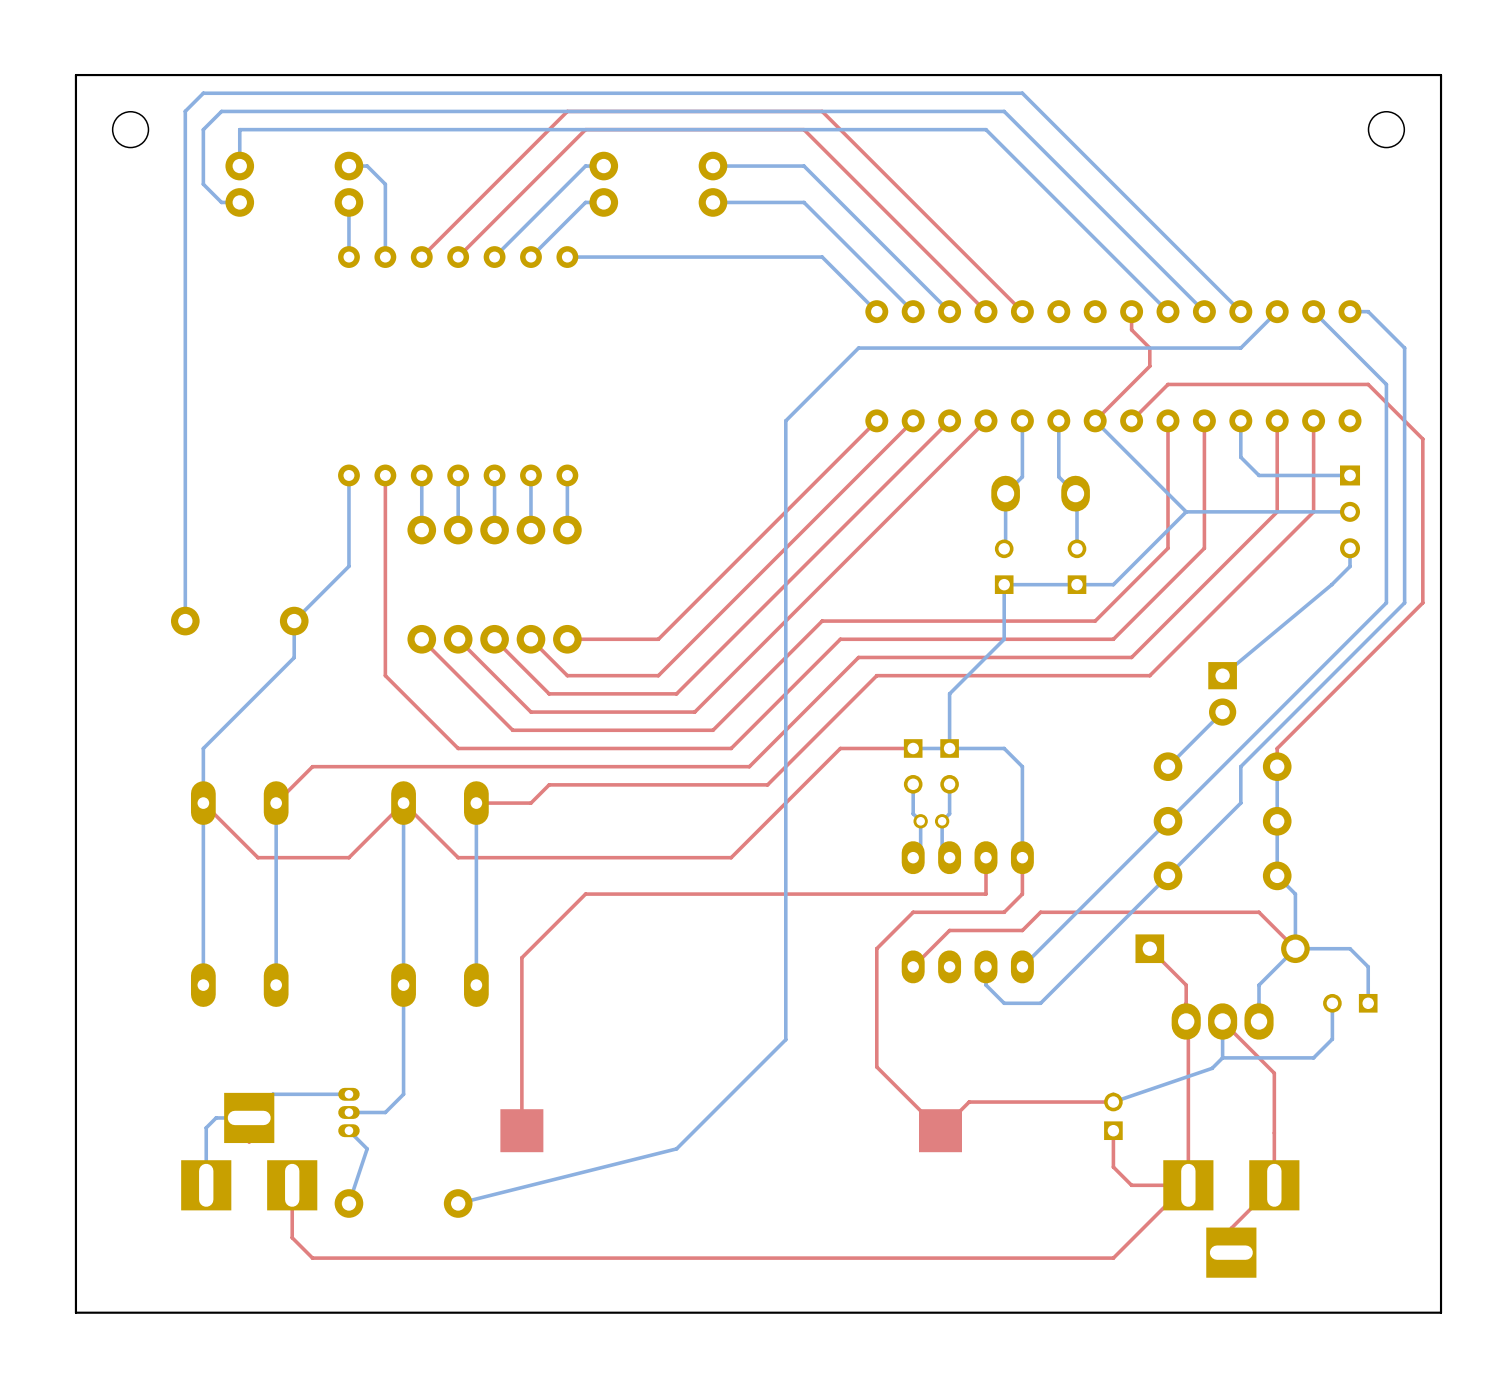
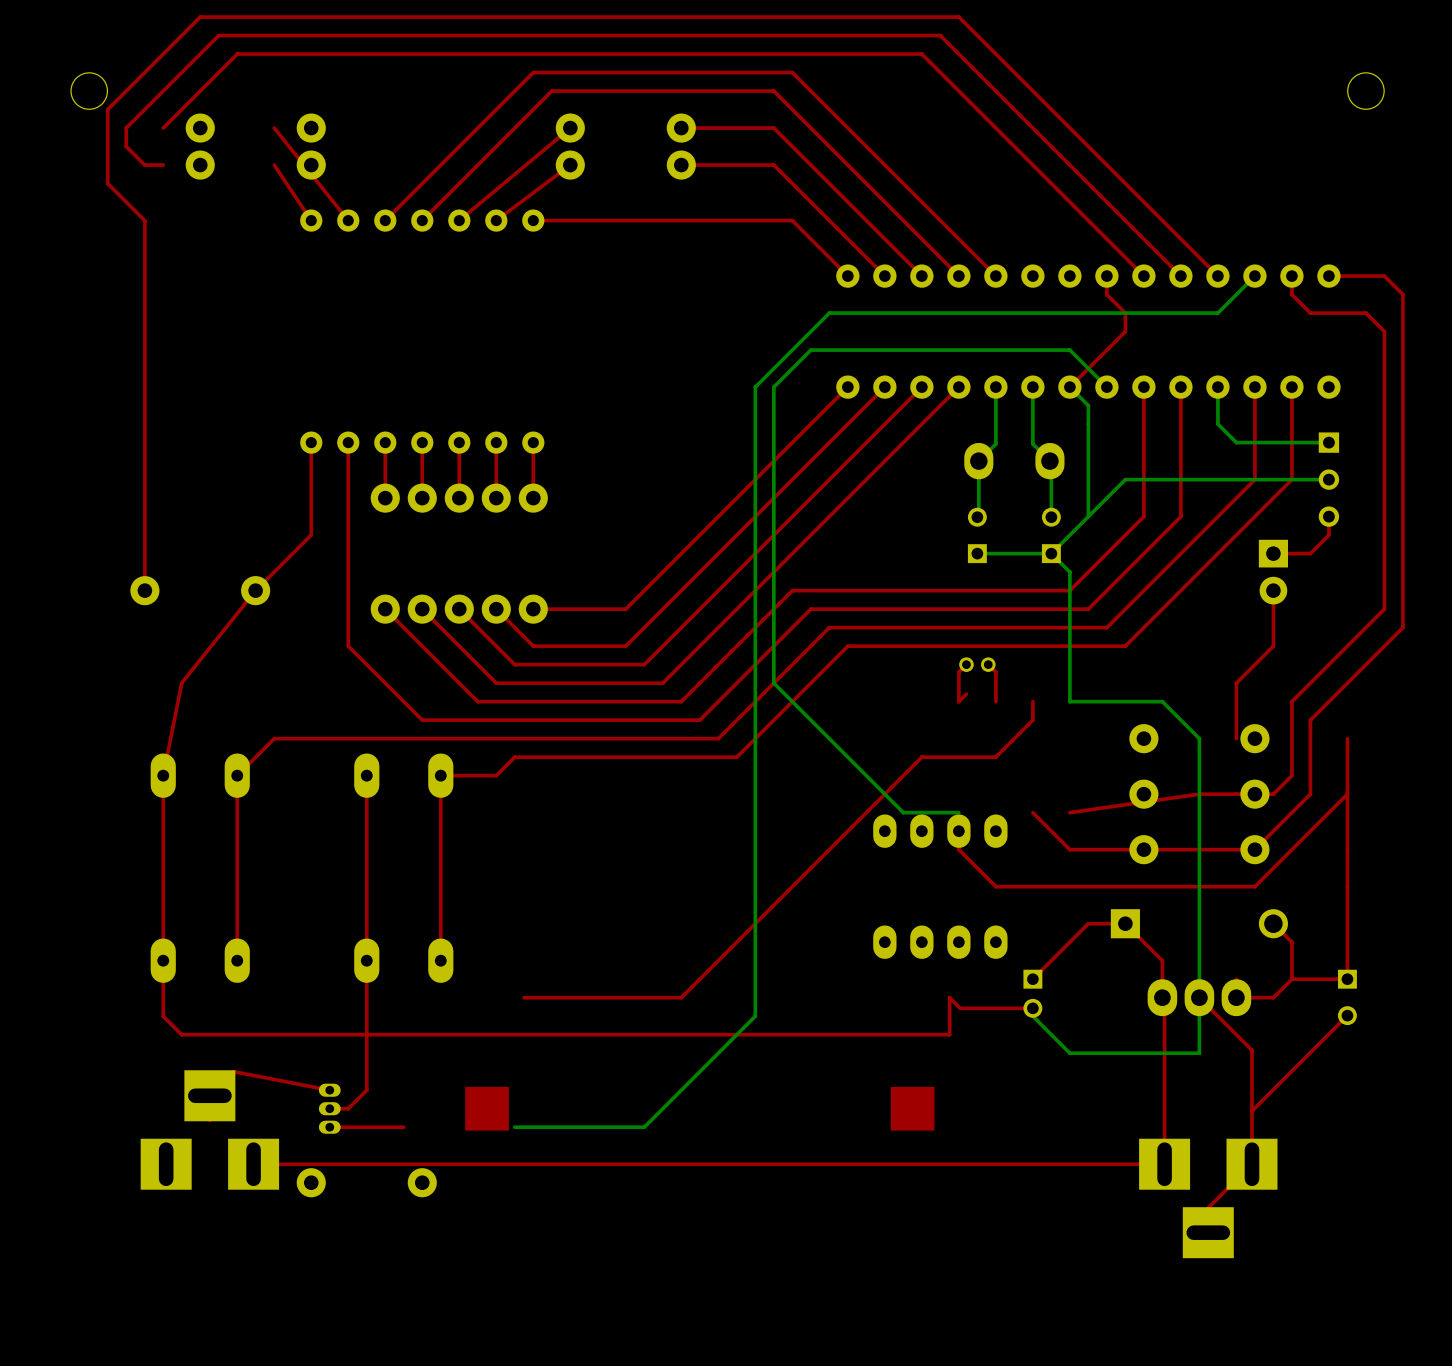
board edge: (1441, 75) (1441, 1312) (75, 1312) (75, 75) (1441, 75) -> none
top track: none -> (163, 128) (237, 54) (921, 54) (1143, 276)
bottom track: (239, 166) (239, 129) (986, 129) (1168, 311) -> none
top track: none -> (274, 128) (348, 220)
bottom track: (348, 166) (367, 166) (385, 184) (385, 257) -> none
top track: none -> (570, 128) (459, 220)
bottom track: (603, 166) (585, 166) (494, 257) -> none
top track: none -> (681, 128) (773, 128) (921, 276)
bottom track: (712, 166) (803, 166) (949, 311) -> none
top track: none -> (163, 165) (144, 165) (126, 146) (126, 128) (218, 35) (940, 35) (1180, 276)
bottom track: (239, 202) (221, 202) (203, 184) (203, 129) (221, 111) (1004, 111) (1204, 311) -> none
top track: none -> (274, 165) (311, 220)
bottom track: (348, 202) (348, 257) -> none
top track: none -> (570, 165) (496, 220)
bottom track: (603, 202) (585, 202) (530, 257) -> none
top track: none -> (681, 165) (773, 165) (884, 276)
bottom track: (712, 202) (803, 202) (913, 311) -> none
top track: none -> (533, 220) (792, 220) (847, 276)
bottom track: (567, 257) (822, 257) (876, 311) -> none
top track: none -> (1217, 276) (958, 17) (200, 17) (107, 109) (107, 183) (144, 220) (144, 590)
bottom track: (1240, 311) (1022, 93) (203, 93) (185, 111) (185, 621) -> none
top track: none -> (1291, 276) (1291, 294) (1310, 313) (1365, 313) (1384, 331) (1384, 609) (1291, 701) (1291, 775) (1273, 794) (1199, 794) (1069, 812)
bottom track: (1313, 311) (1386, 384) (1386, 602) (1022, 966) -> none
bottom track: (1350, 311) (1368, 311) (1404, 348) (1404, 602) (1240, 766) (1240, 803) (1040, 1003) (1004, 1003) (986, 985) (986, 966) -> none
top track: (1131, 420) (1168, 384) (1368, 384) (1422, 439) -> (1328, 276) (1384, 276) (1402, 294) (1402, 405)
bottom track: none -> (1106, 387) (1069, 350) (810, 350) (773, 387) (773, 683) (903, 812) (958, 812)
bottom track: (1113, 439) (1186, 511) (1113, 584) (1077, 584) -> (1088, 405) (1088, 516)
top track: none -> (311, 442) (311, 534) (255, 590) (181, 683) (163, 775) (163, 1016) (181, 1034) (949, 1034) (949, 997) (960, 1008) (1032, 1008) (1032, 1016)
bottom track: (348, 475) (348, 566) (294, 621) (294, 657) (203, 748) (203, 985) -> none
top track: none -> (385, 442) (385, 498)
bottom track: (421, 475) (421, 530) -> none
top track: none -> (422, 442) (422, 498)
bottom track: (458, 475) (458, 530) -> none
top track: none -> (459, 442) (459, 498)
bottom track: (494, 475) (494, 530) -> none
top track: none -> (496, 442) (496, 498)
bottom track: (530, 475) (530, 530) -> none
top track: none -> (533, 442) (533, 498)
bottom track: (567, 475) (567, 530) -> none
bottom track: none -> (1162, 479) (1125, 479) (1051, 553) (1069, 572) (1069, 701) (1162, 701) (1199, 738) (1199, 997)
top track: none -> (1328, 516) (1328, 535) (1310, 553) (1273, 553)
bottom track: (1350, 548) (1350, 566) (1331, 584) (1222, 675) -> none
bottom track: (1004, 584) (1004, 639) (949, 693) (949, 748) -> none
top track: (1422, 602) (1277, 748) (1277, 766) -> (1402, 572) (1402, 627) (1310, 720) (1310, 794) (1254, 849) (1069, 849) (1032, 812)
top track: none -> (1273, 590) (1273, 646) (1236, 683) (1236, 738)
top track: none -> (966, 664) (958, 672) (958, 701) (966, 694)
top track: none -> (988, 664) (995, 672) (995, 701)
part position: (1222, 693) -> (1273, 572)
bottom track: (1222, 712) (1168, 766) -> none
top track: none -> (1032, 701) (1032, 720) (995, 757) (921, 757) (681, 997) (524, 997)
top track: (913, 748) (840, 748) (731, 857) (458, 857) (403, 803) (348, 857) (257, 857) (203, 803) -> none
bottom track: (913, 748) (1004, 748) (1022, 766) (1022, 857) -> none
part: (913, 766) -> none
part: (949, 766) -> none
bottom track: (1277, 766) (1277, 875) (1295, 894) (1295, 948) -> none
top track: none -> (1347, 738) (1347, 979) (1291, 979)
bottom track: (949, 784) (949, 813) (942, 821) (942, 850) (949, 857) -> none
bottom track: (911, 785) (913, 784) (913, 813) (920, 821) (920, 850) (913, 857) -> none
top track: none -> (237, 775) (237, 960)
bottom track: (276, 803) (276, 985) -> none
top track: none -> (366, 775) (366, 960)
bottom track: (403, 803) (403, 1094) (385, 1112) (348, 1112) -> none
top track: none -> (440, 775) (440, 960)
bottom track: (476, 803) (476, 985) -> none
part position: (931, 821) -> (977, 664)
top track: none -> (1347, 794) (1254, 886) (1236, 886)
top track: (1022, 857) (1022, 894) (1004, 912) (913, 912) (876, 948) (876, 1066) (950, 1141) -> none
top track: (986, 875) (986, 894) (585, 894) (521, 957) (521, 1130) -> none
top track: (1040, 912) (1022, 930) (949, 930) (913, 966) -> (1014, 886) (995, 886) (958, 849)
top track: (1259, 912) (1295, 948) -> (1291, 979) (1291, 942) (1273, 923)
top track: none -> (1125, 923) (1088, 923) (1032, 979)
bottom track: (1295, 948) (1350, 948) (1368, 966) (1368, 1003) -> none
bottom track: (1295, 948) (1259, 985) (1259, 1021) -> none
top track: none -> (366, 979) (366, 1090) (348, 1108) (329, 1108)
top track: none -> (1291, 979) (1273, 997) (1236, 997)
bottom track: (1332, 1003) (1332, 1039) (1313, 1057) (1222, 1057) (1212, 1068) (1113, 1102) (1113, 1094) -> none
part rotation: 0° (1350, 1003) -> 90° counterclockwise (1347, 997)
bottom track: none -> (1032, 1008) (1032, 1016) (1069, 1053) (1199, 1053) (1199, 1034)
top track: none -> (1347, 1016) (1252, 1111)
top track: none -> (233, 1071) (329, 1090)
bottom track: (348, 1094) (272, 1094) (249, 1117) (216, 1117) (206, 1127) (206, 1185) -> none
top track: (1113, 1094) (1113, 1102) (969, 1102) (940, 1130) -> none
part position: (348, 1112) -> (329, 1108)
part rotation: 0° (1113, 1116) -> 180° (1032, 993)
part position: (1113, 1116) -> (1032, 993)
bottom track: (348, 1130) (367, 1148) (348, 1203) -> none
top track: (1113, 1130) (1113, 1167) (1131, 1185) -> none
top track: none -> (403, 1127) (329, 1127)
bottom track: (676, 1148) (458, 1203) -> (644, 1127) (514, 1127)
top track: (1186, 1185) (1113, 1258) (312, 1258) (292, 1237) (292, 1185) -> (1106, 1164) (253, 1164)

